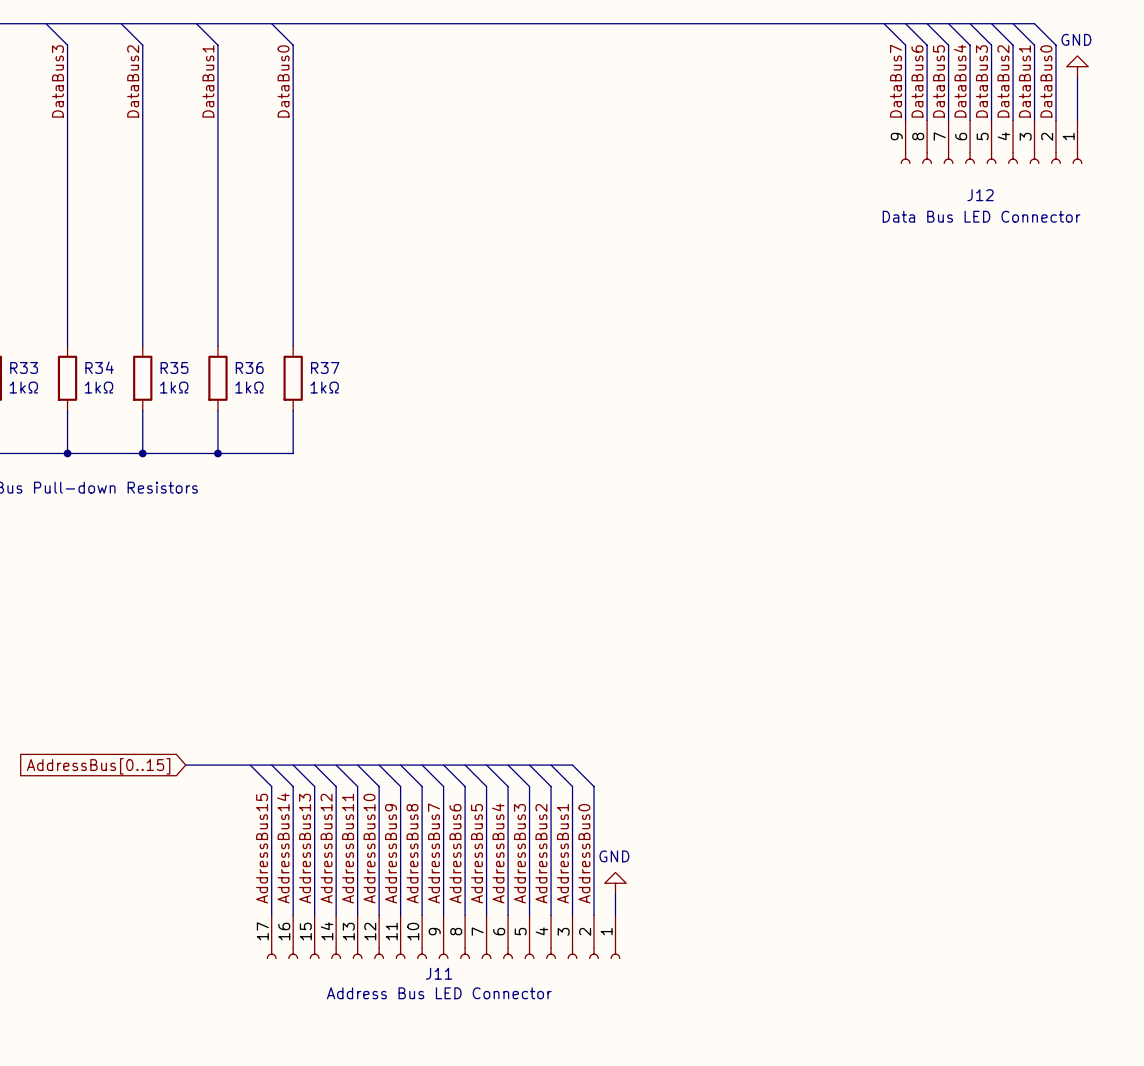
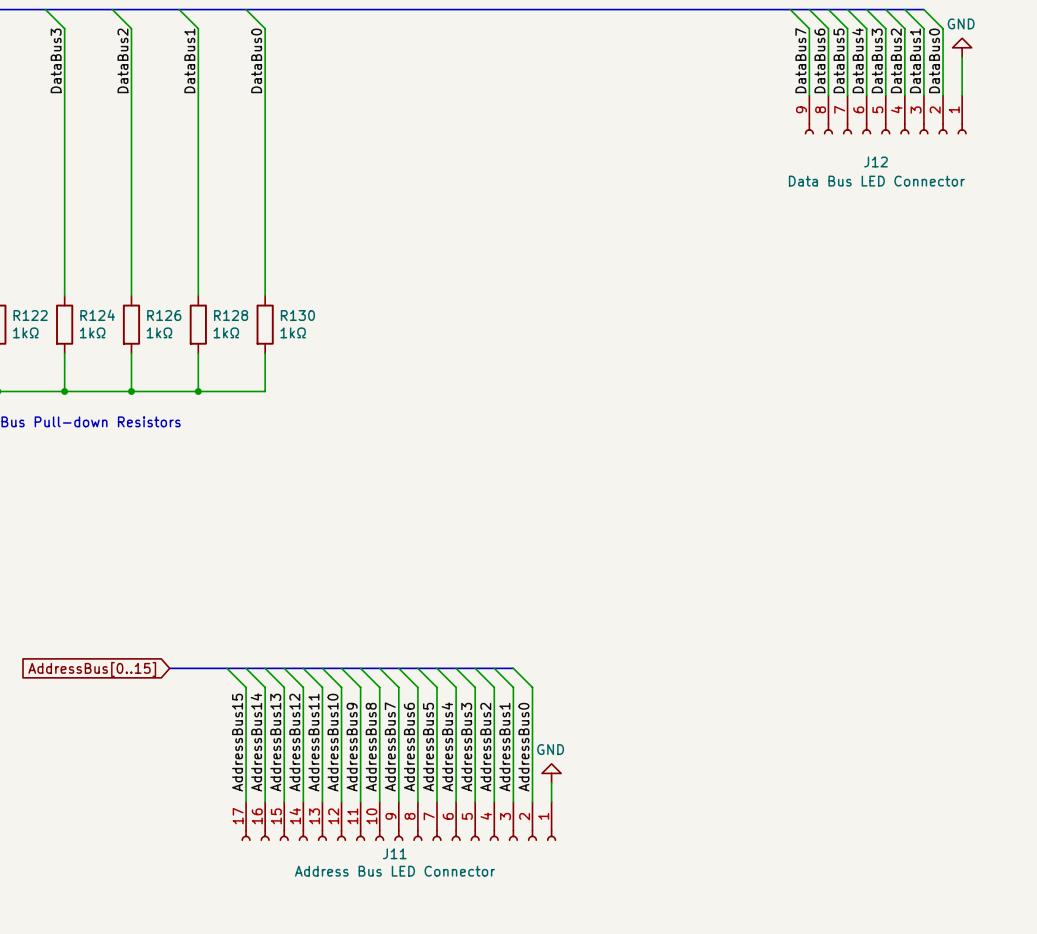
R33 name: R33 (24, 367) -> R122 (30, 315)
R34 name: R34 (99, 367) -> R124 (97, 315)
R35 name: R35 (174, 367) -> R126 (164, 315)
R36 name: R36 (249, 367) -> R128 (231, 315)
R37 name: R37 (325, 367) -> R130 (297, 315)

